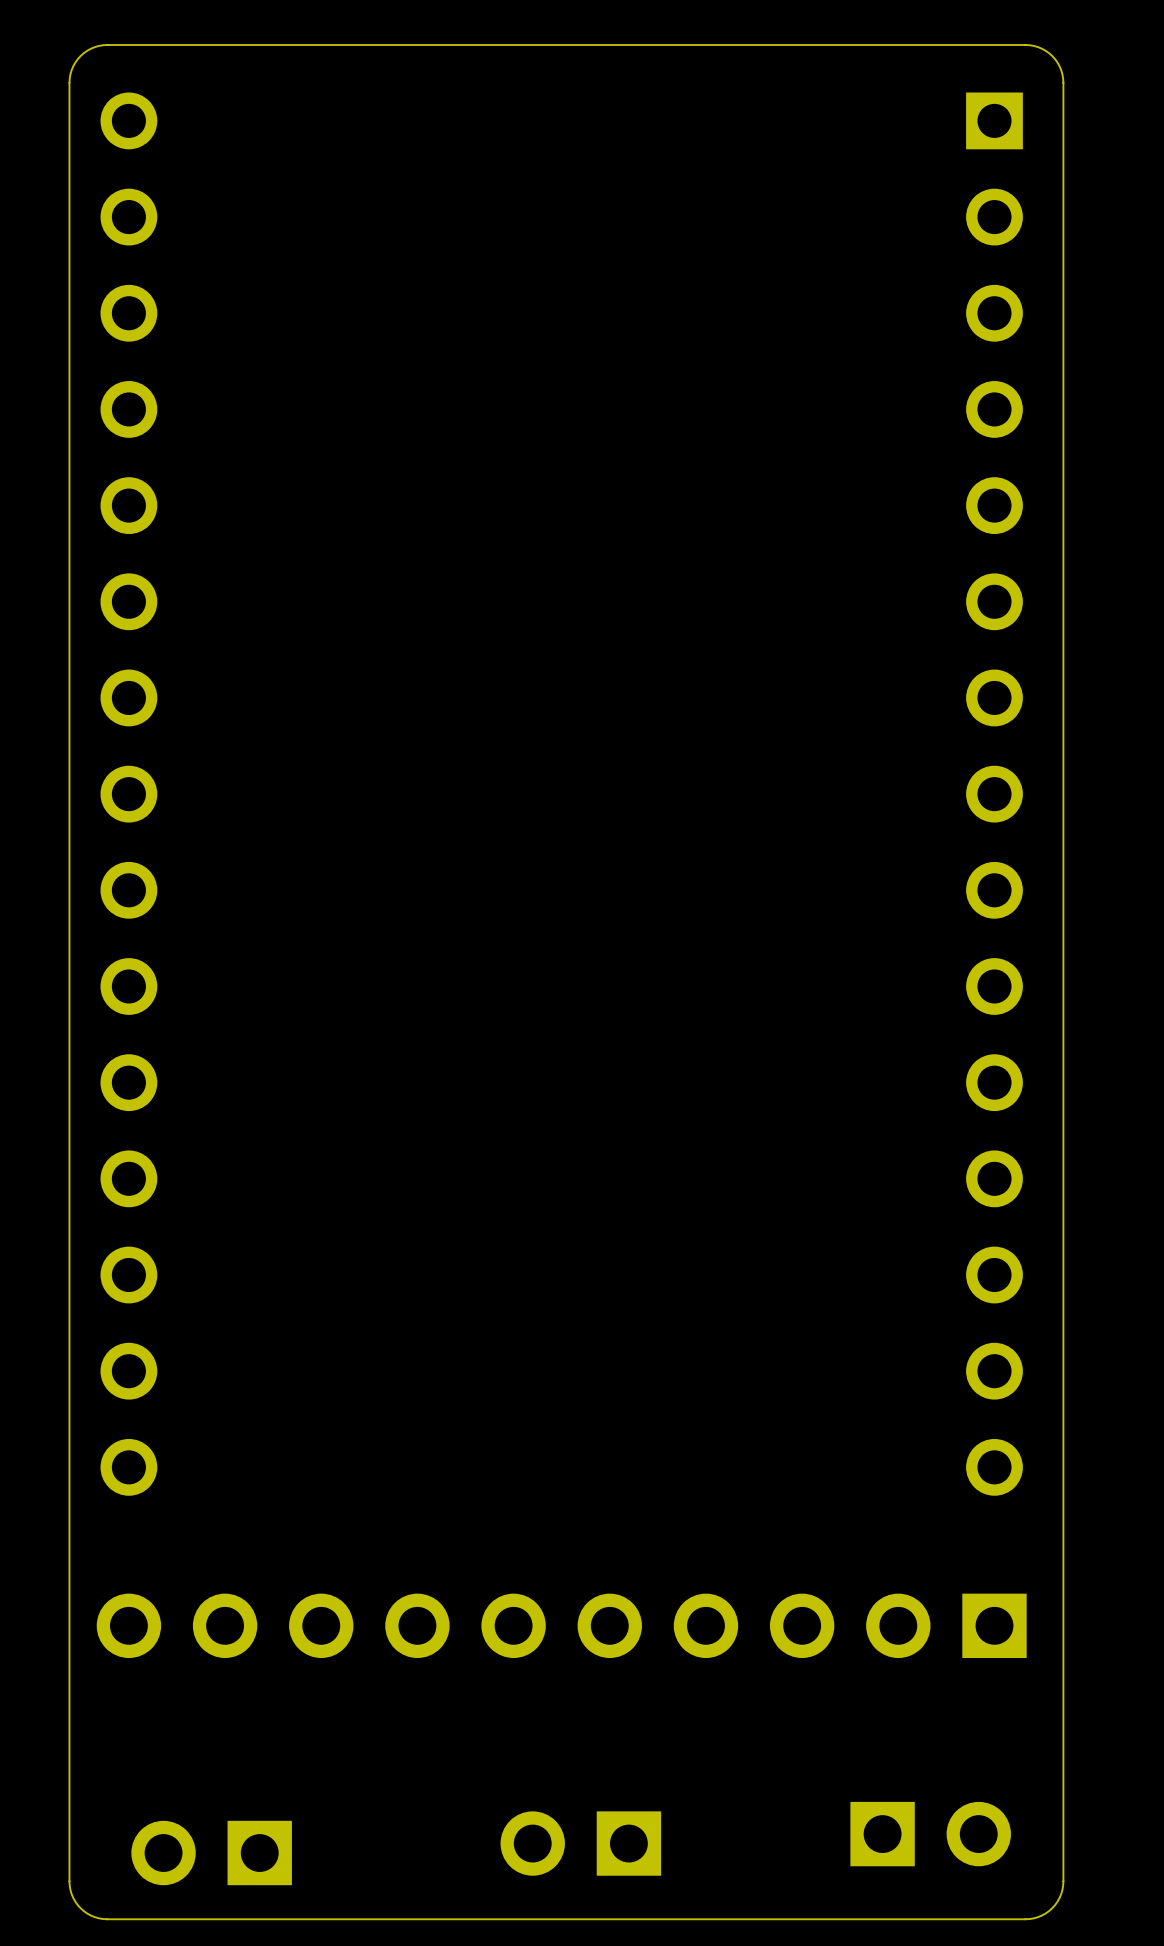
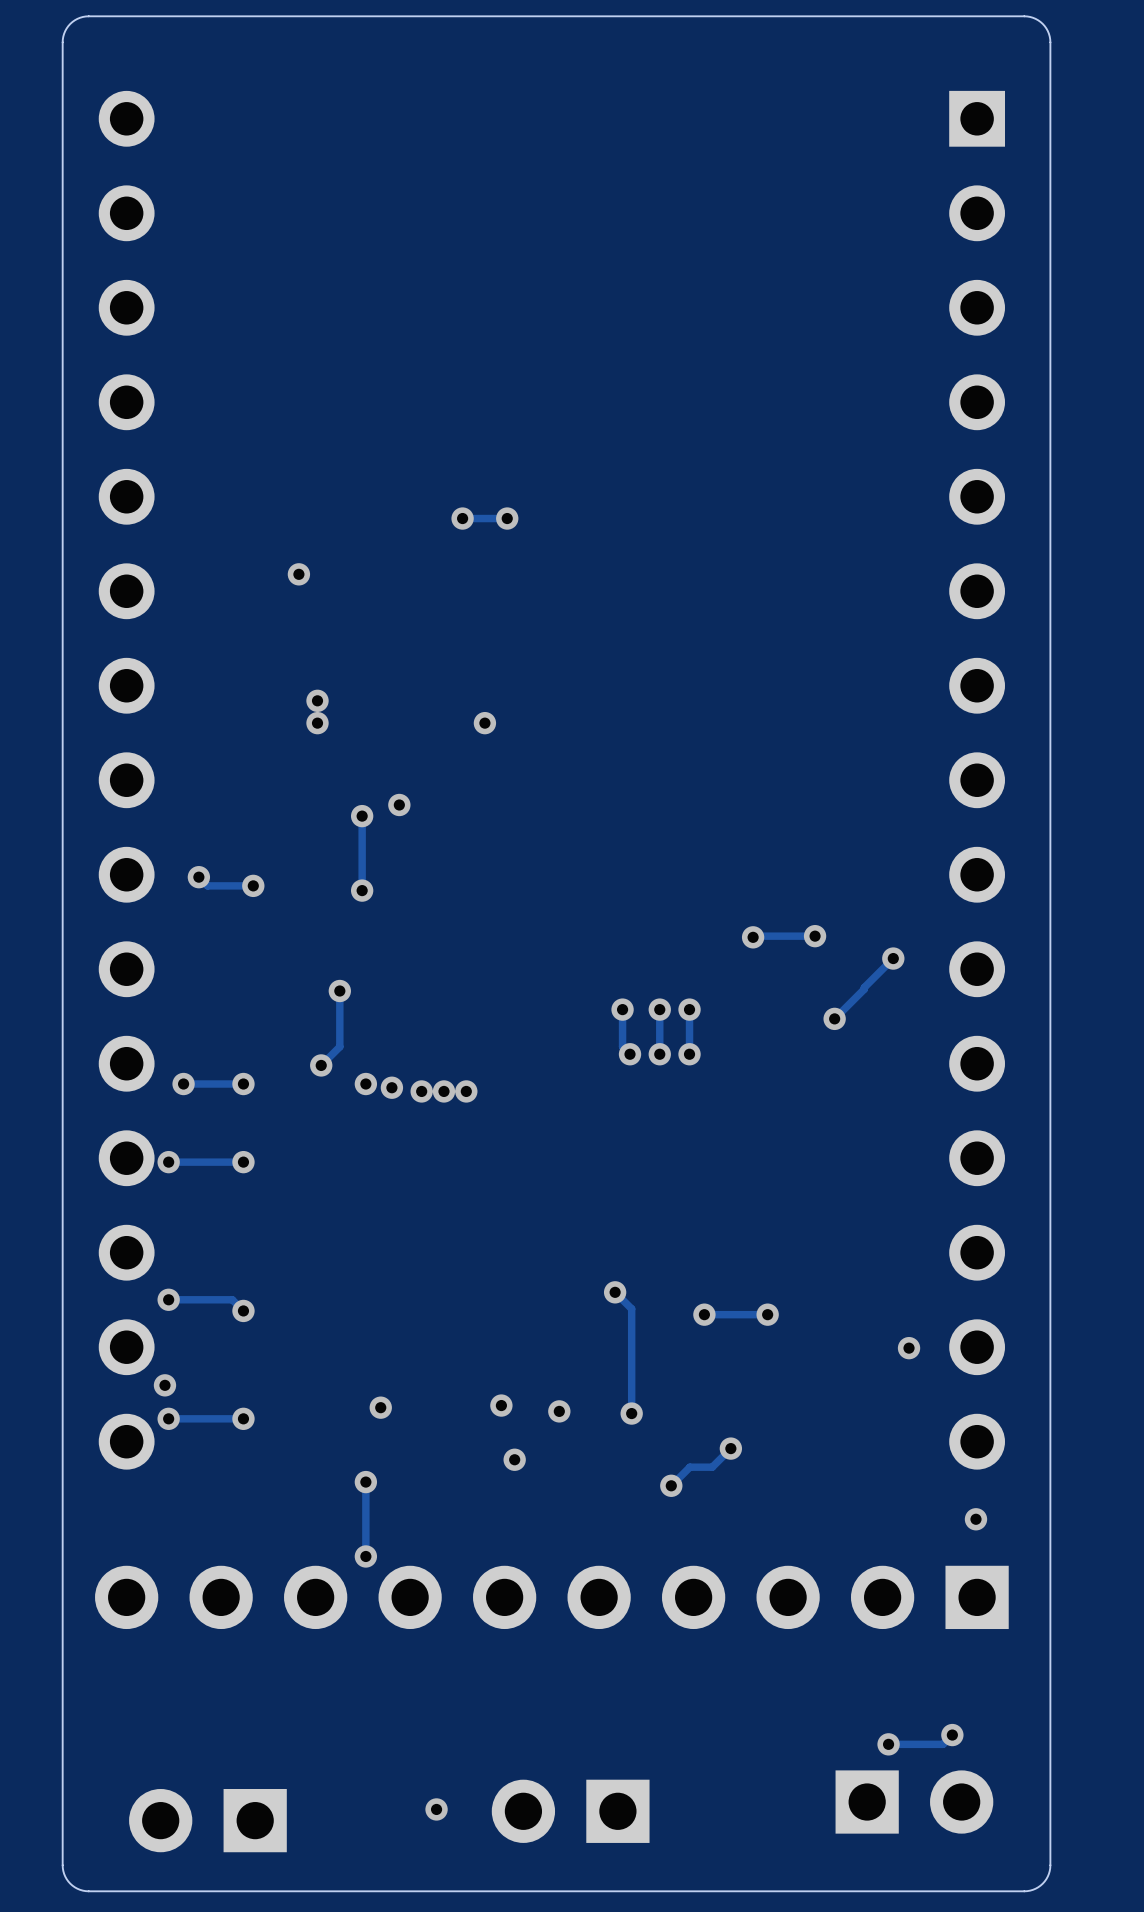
board edge: (1025, 44) (107, 44) (87, 50) (73, 66) (69, 82) (69, 1881) (75, 1901) (90, 1915) (107, 1919) (1025, 1919) (1045, 1913) (1059, 1897) (1063, 1881) (1063, 82) (1059, 66) (1052, 56) (1038, 47) (1025, 44) -> (1024, 16) (1035, 18) (1042, 23) (1047, 31) (1050, 42) (1050, 1865) (1047, 1876) (1038, 1887) (1024, 1891) (88, 1891) (77, 1888) (66, 1879) (62, 1865) (62, 42) (65, 31) (74, 20) (88, 16) (1024, 16)
via: none -> (462, 518)
track: none -> (507, 518) (462, 518)
via: none -> (507, 518)
via: none -> (298, 574)
via: none -> (317, 700)
via: none -> (317, 723)
via: none -> (484, 723)
via: none -> (399, 804)
track: none -> (362, 816) (362, 890)
via: none -> (362, 816)
track: none -> (198, 877) (207, 885) (253, 885)
via: none -> (198, 877)
via: none -> (253, 885)
via: none -> (362, 890)
track: none -> (815, 936) (753, 937)
via: none -> (815, 936)
via: none -> (753, 937)
track: none -> (893, 958) (834, 1018)
via: none -> (893, 958)
track: none -> (339, 991) (339, 1046) (321, 1065)
via: none -> (339, 991)
track: none -> (622, 1009) (622, 1046) (630, 1054)
via: none -> (622, 1009)
track: none -> (659, 1009) (659, 1054)
via: none -> (659, 1009)
track: none -> (689, 1009) (689, 1054)
via: none -> (689, 1009)
via: none -> (834, 1018)
via: none -> (630, 1054)
via: none -> (659, 1054)
via: none -> (689, 1054)
via: none -> (321, 1065)
via: none -> (183, 1084)
track: none -> (243, 1084) (183, 1084)
via: none -> (243, 1084)
via: none -> (365, 1084)
via: none -> (391, 1087)
via: none -> (421, 1091)
via: none -> (443, 1091)
via: none -> (466, 1091)
via: none -> (168, 1162)
track: none -> (243, 1162) (168, 1162)
via: none -> (243, 1162)
track: none -> (615, 1292) (631, 1308) (631, 1413)
via: none -> (615, 1292)
track: none -> (168, 1299) (232, 1299) (243, 1310)
via: none -> (168, 1299)
via: none -> (243, 1310)
via: none -> (704, 1314)
track: none -> (767, 1314) (704, 1314)
via: none -> (767, 1314)
via: none -> (909, 1348)
via: none -> (164, 1385)
via: none -> (501, 1405)
via: none -> (380, 1407)
via: none -> (559, 1411)
via: none -> (631, 1413)
via: none -> (168, 1418)
track: none -> (243, 1418) (168, 1418)
via: none -> (243, 1418)
track: none -> (730, 1447) (712, 1467) (689, 1467) (671, 1485)
via: none -> (730, 1448)
via: none -> (514, 1459)
track: none -> (365, 1482) (365, 1556)
via: none -> (365, 1482)
via: none -> (671, 1485)
via: none -> (975, 1519)
via: none -> (365, 1556)
track: none -> (952, 1735) (943, 1744) (888, 1744)
via: none -> (952, 1735)
via: none -> (888, 1744)
via: none -> (436, 1809)

